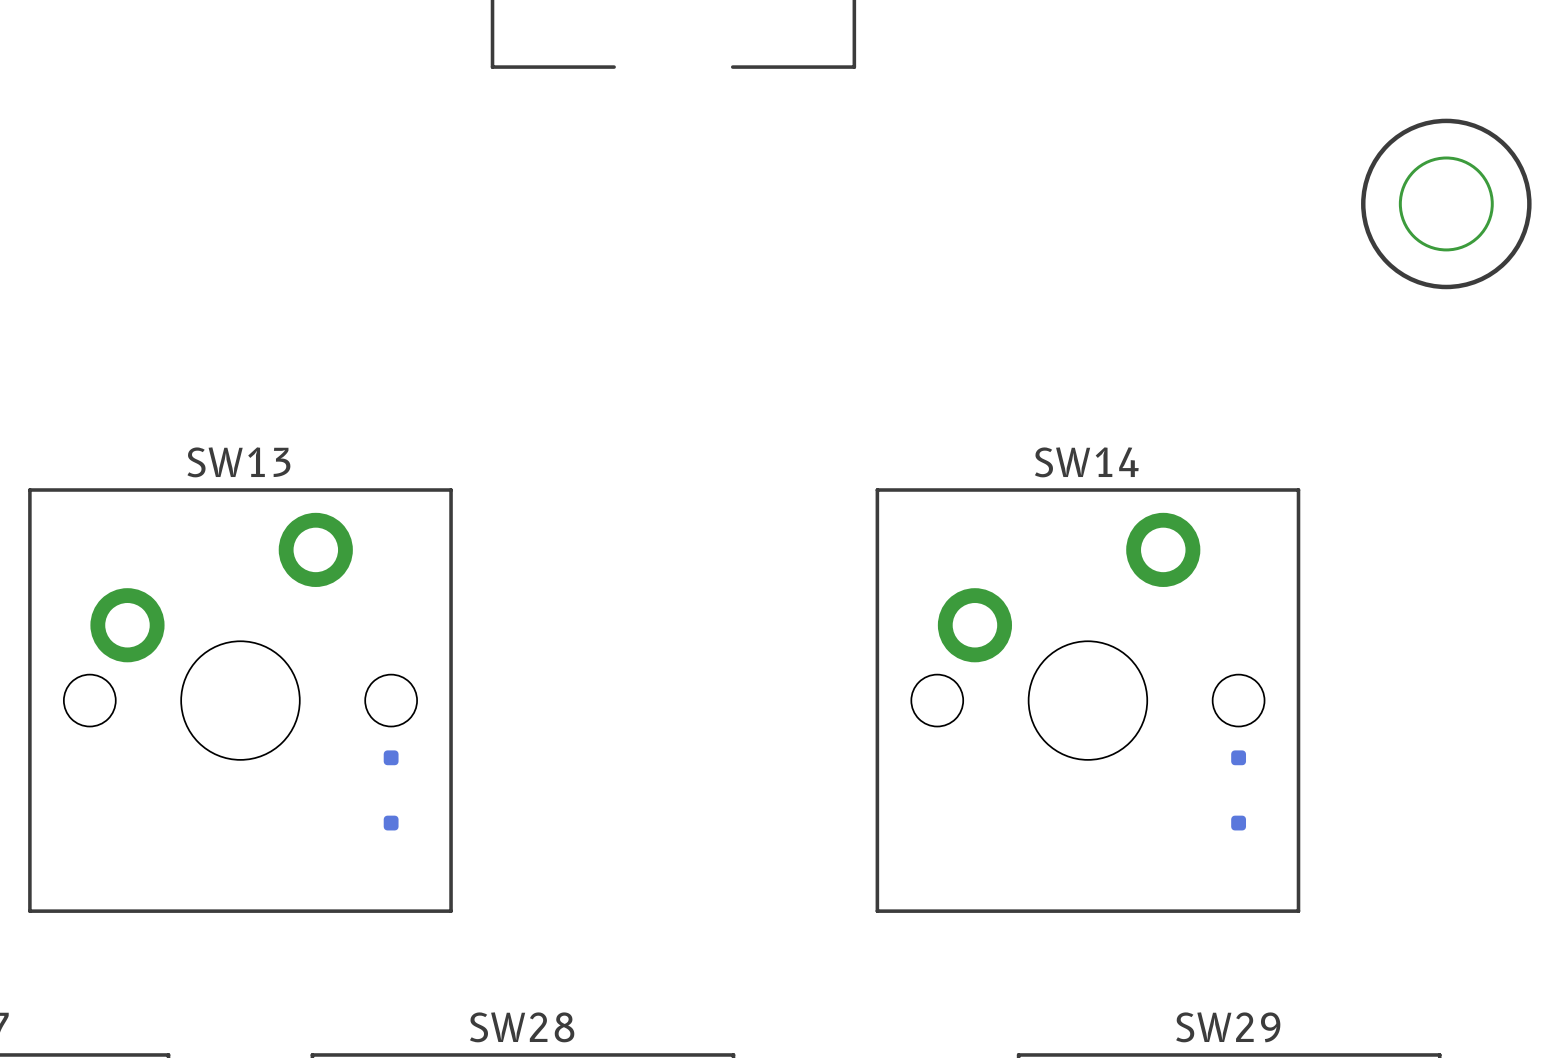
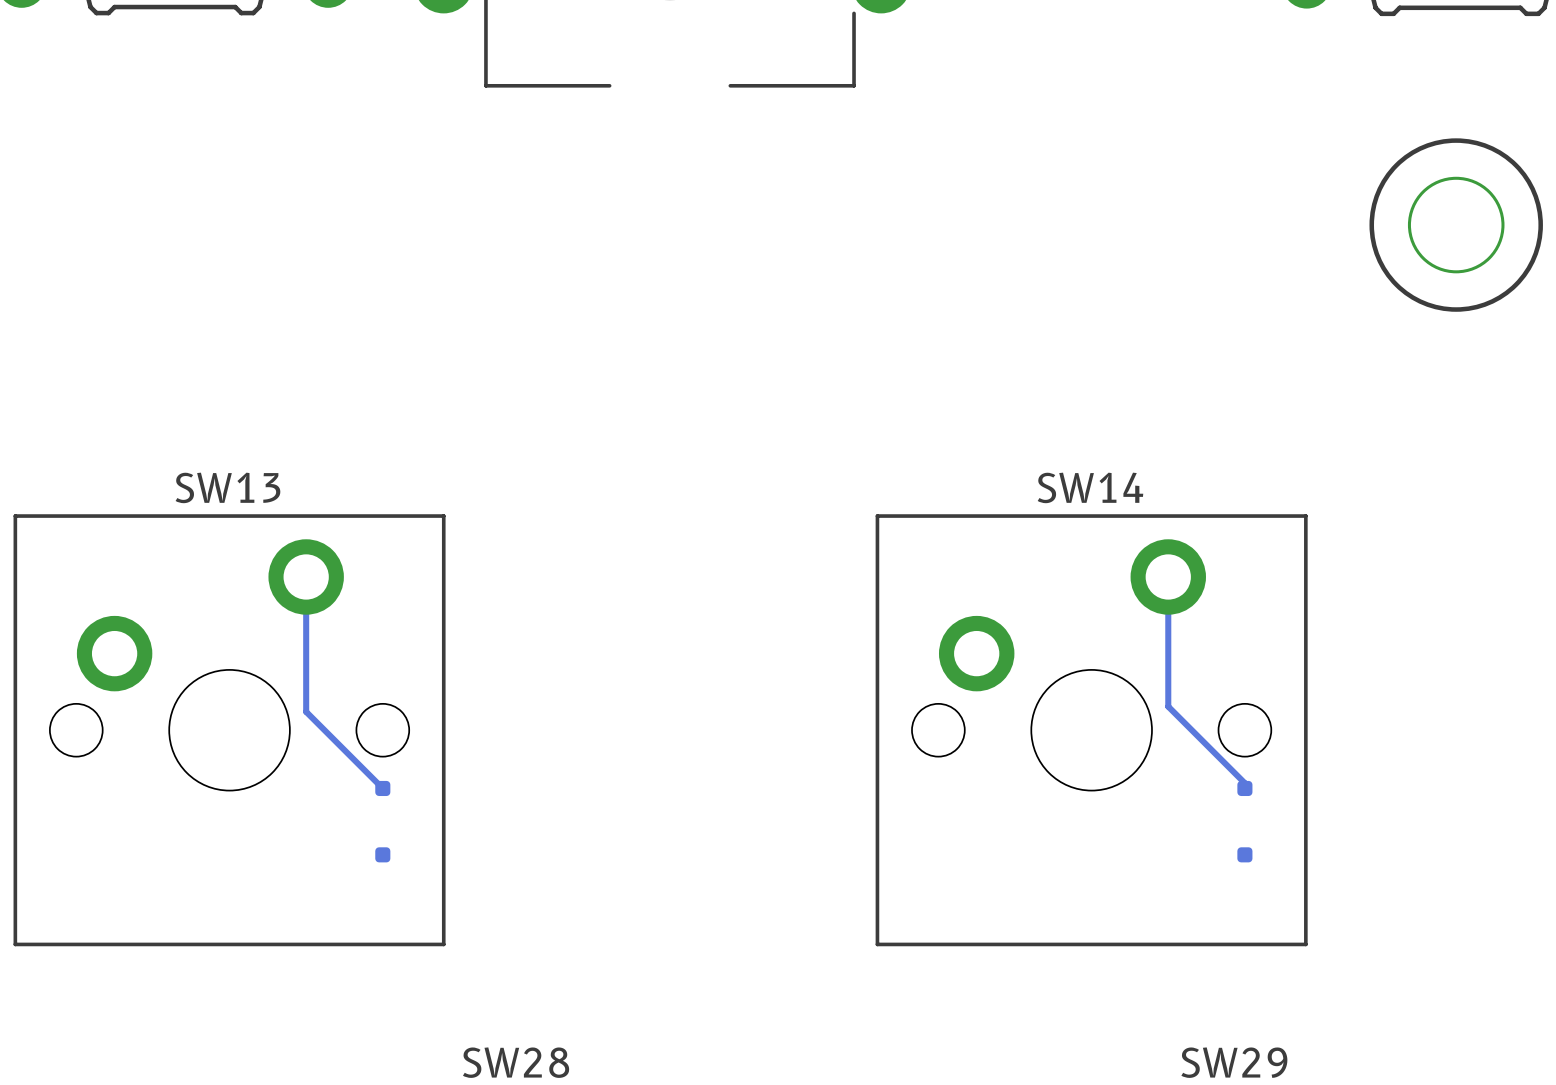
bottom track: none -> (306, 576) (306, 711) (382, 788)
bottom track: none -> (1168, 576) (1168, 706) (1244, 783) (1244, 788)

